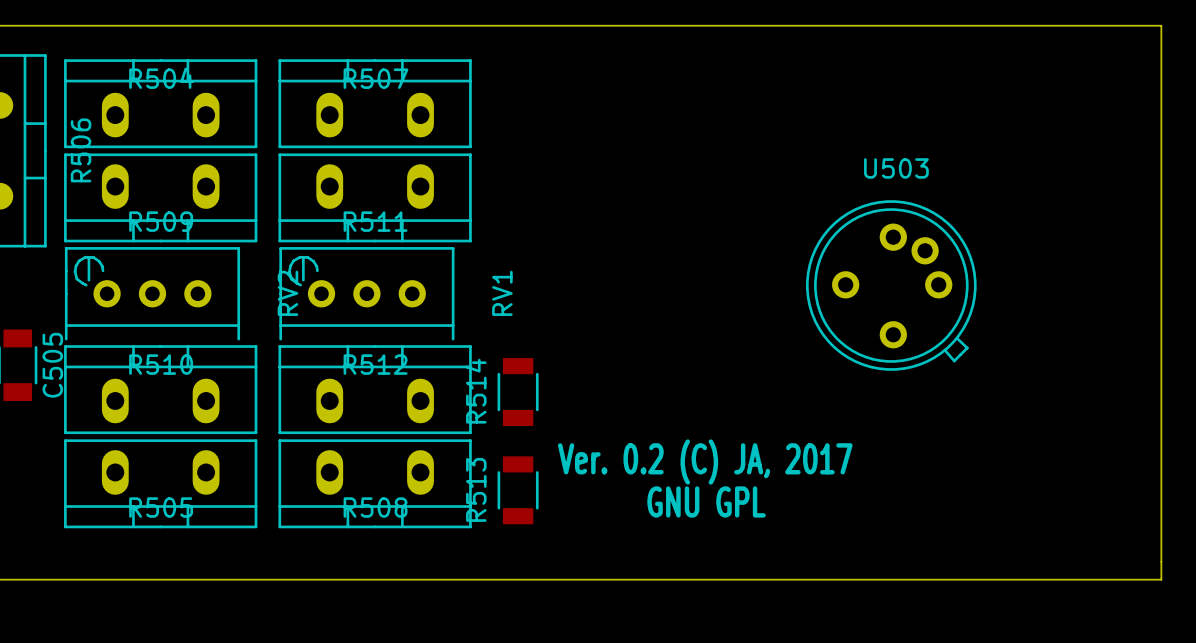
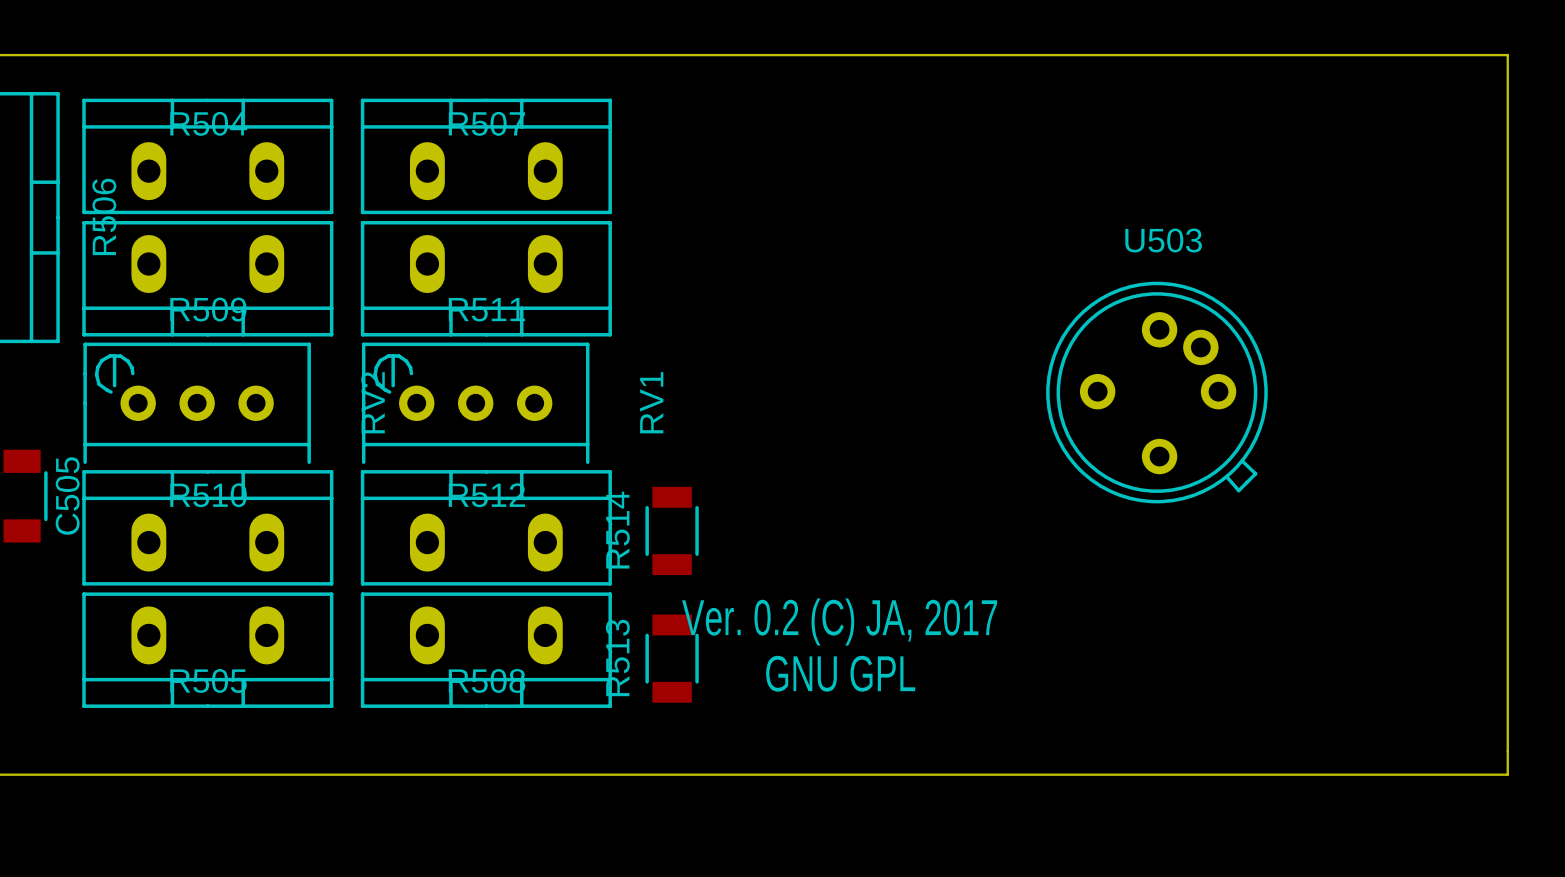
text position: Ver. 0.2 (C) JA, 2017 (705, 462) -> Ver. 0.2 (C) JA, 2017 (839, 622)
text position: GNU GPL (706, 501) -> GNU GPL (840, 673)

